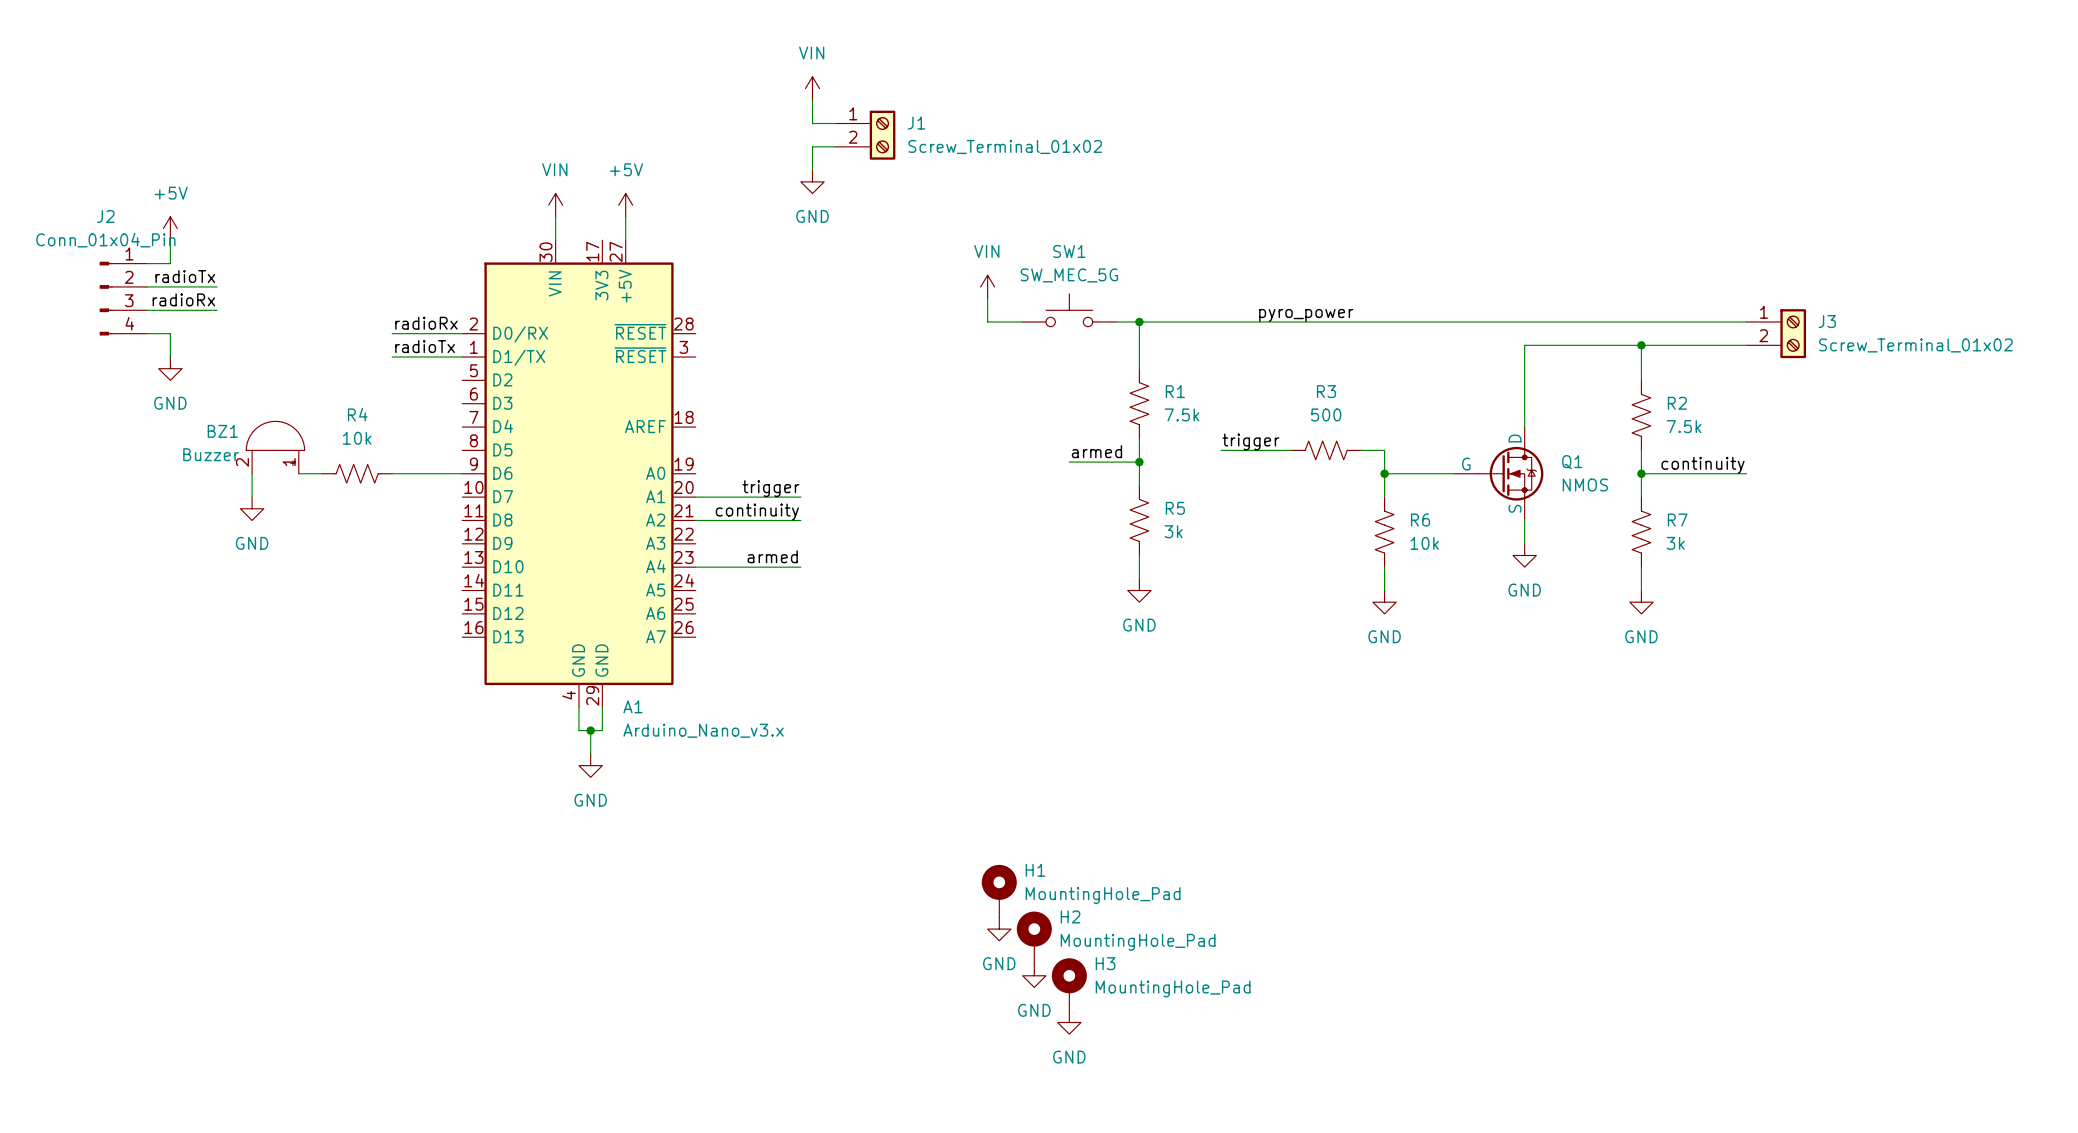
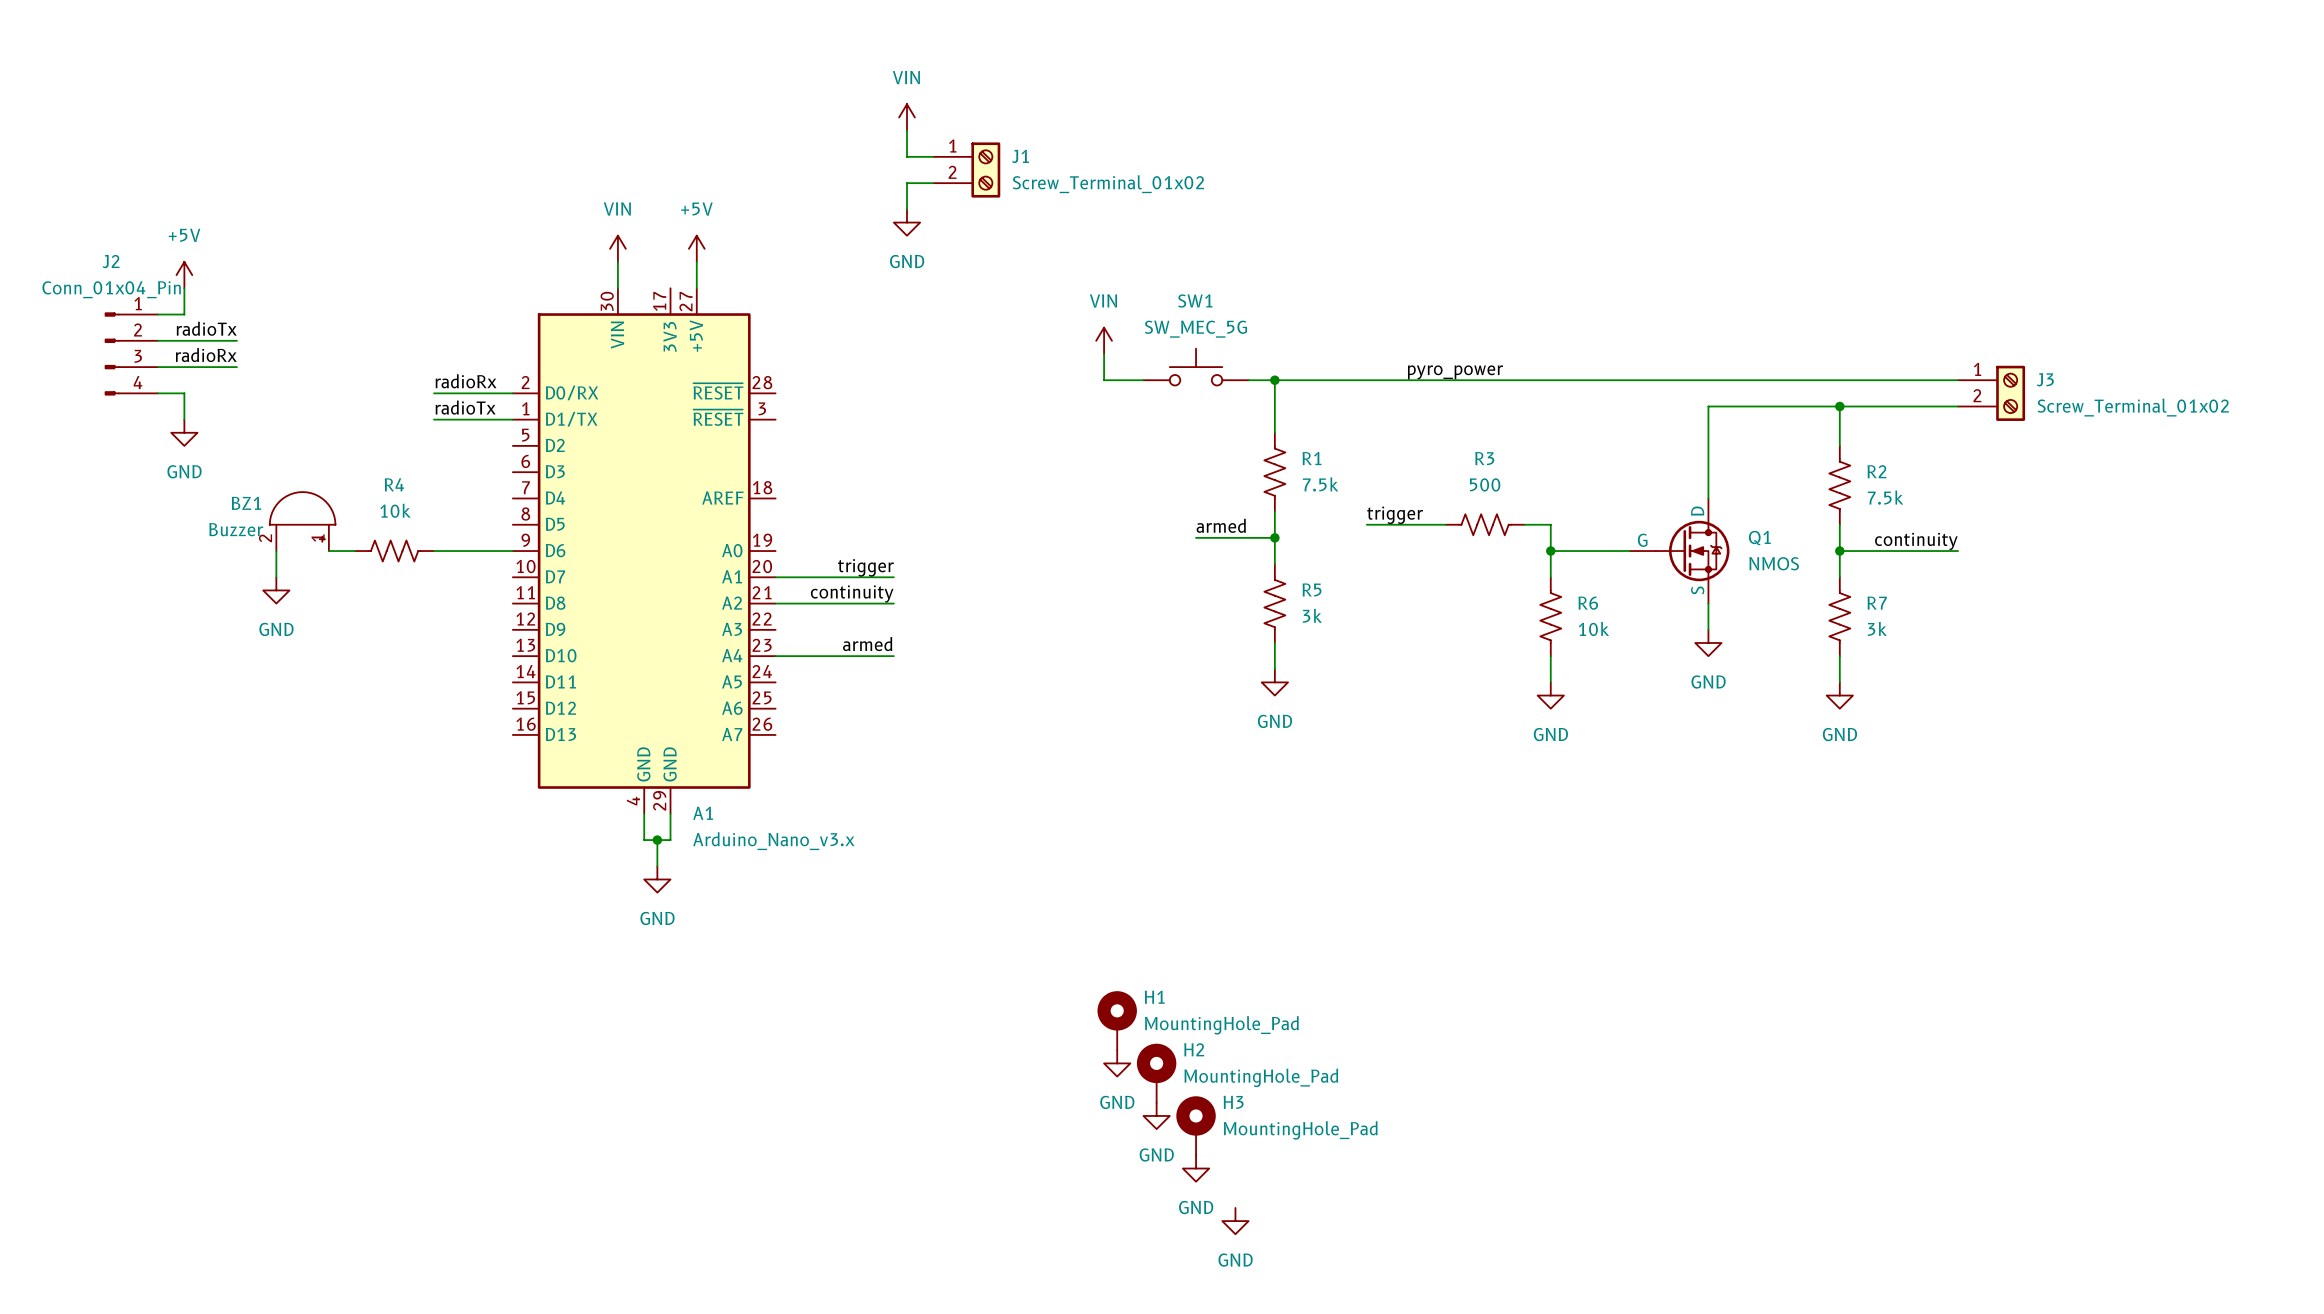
power symbol: none -> GND (1235, 1221)

